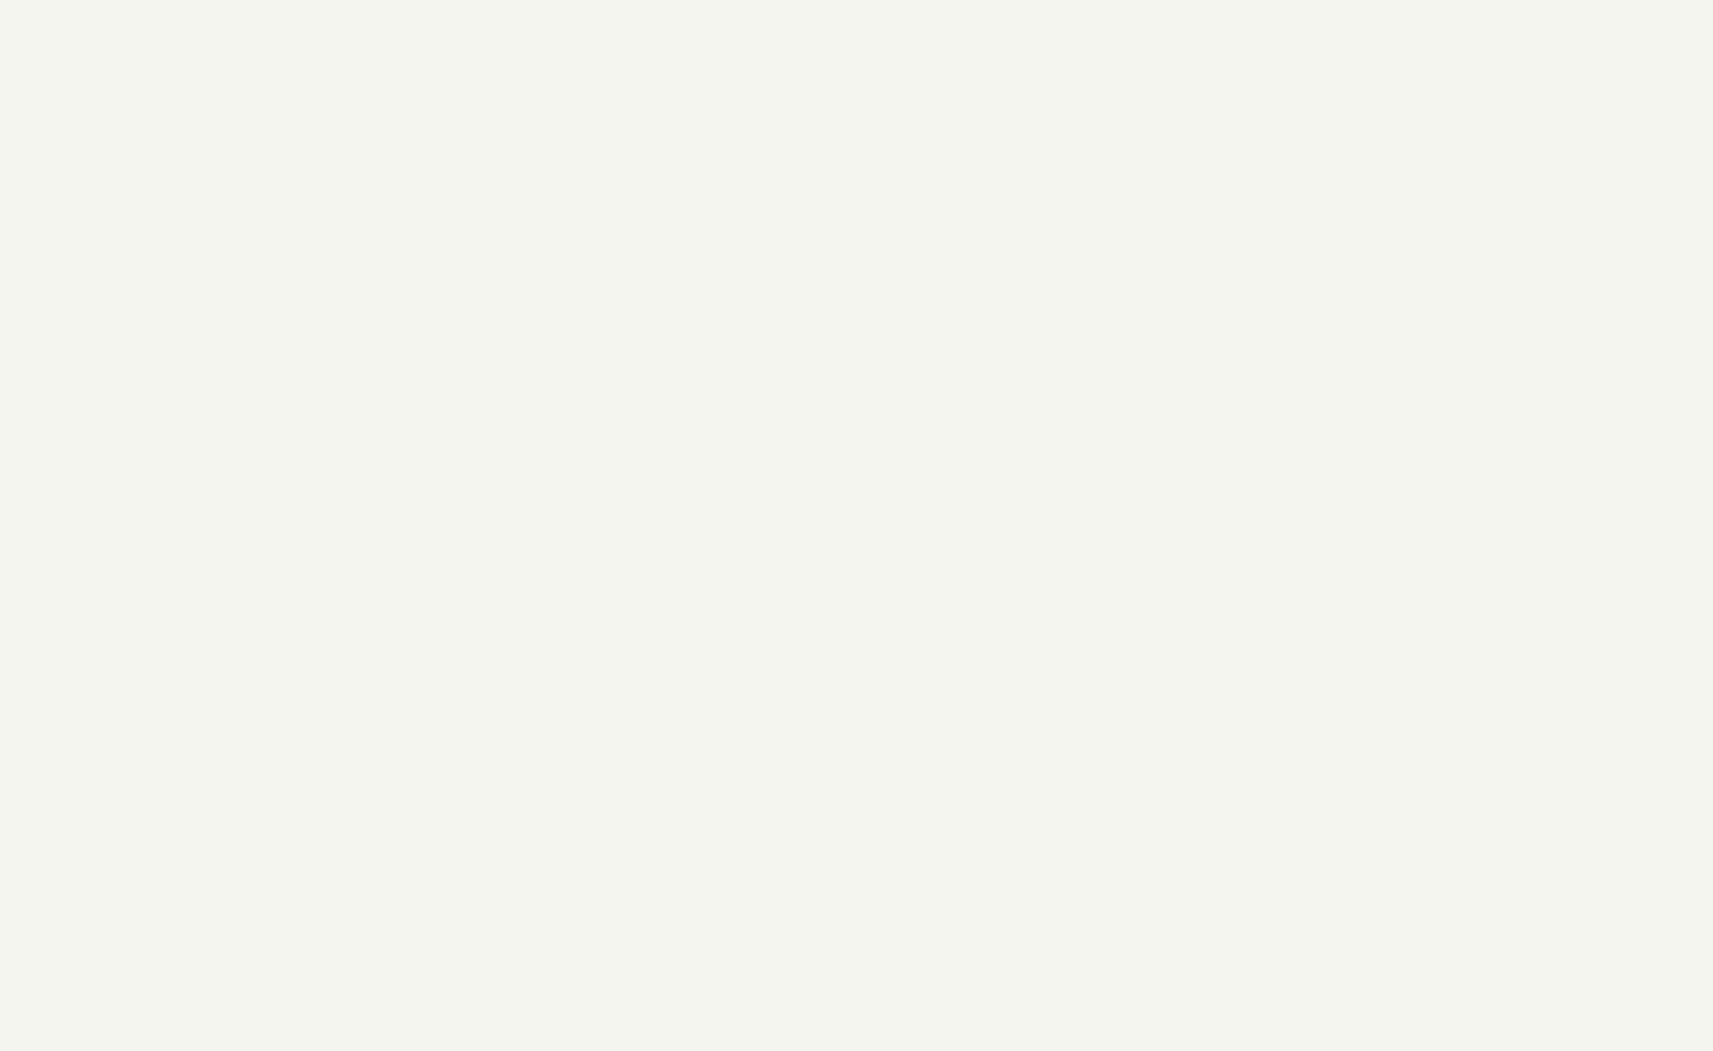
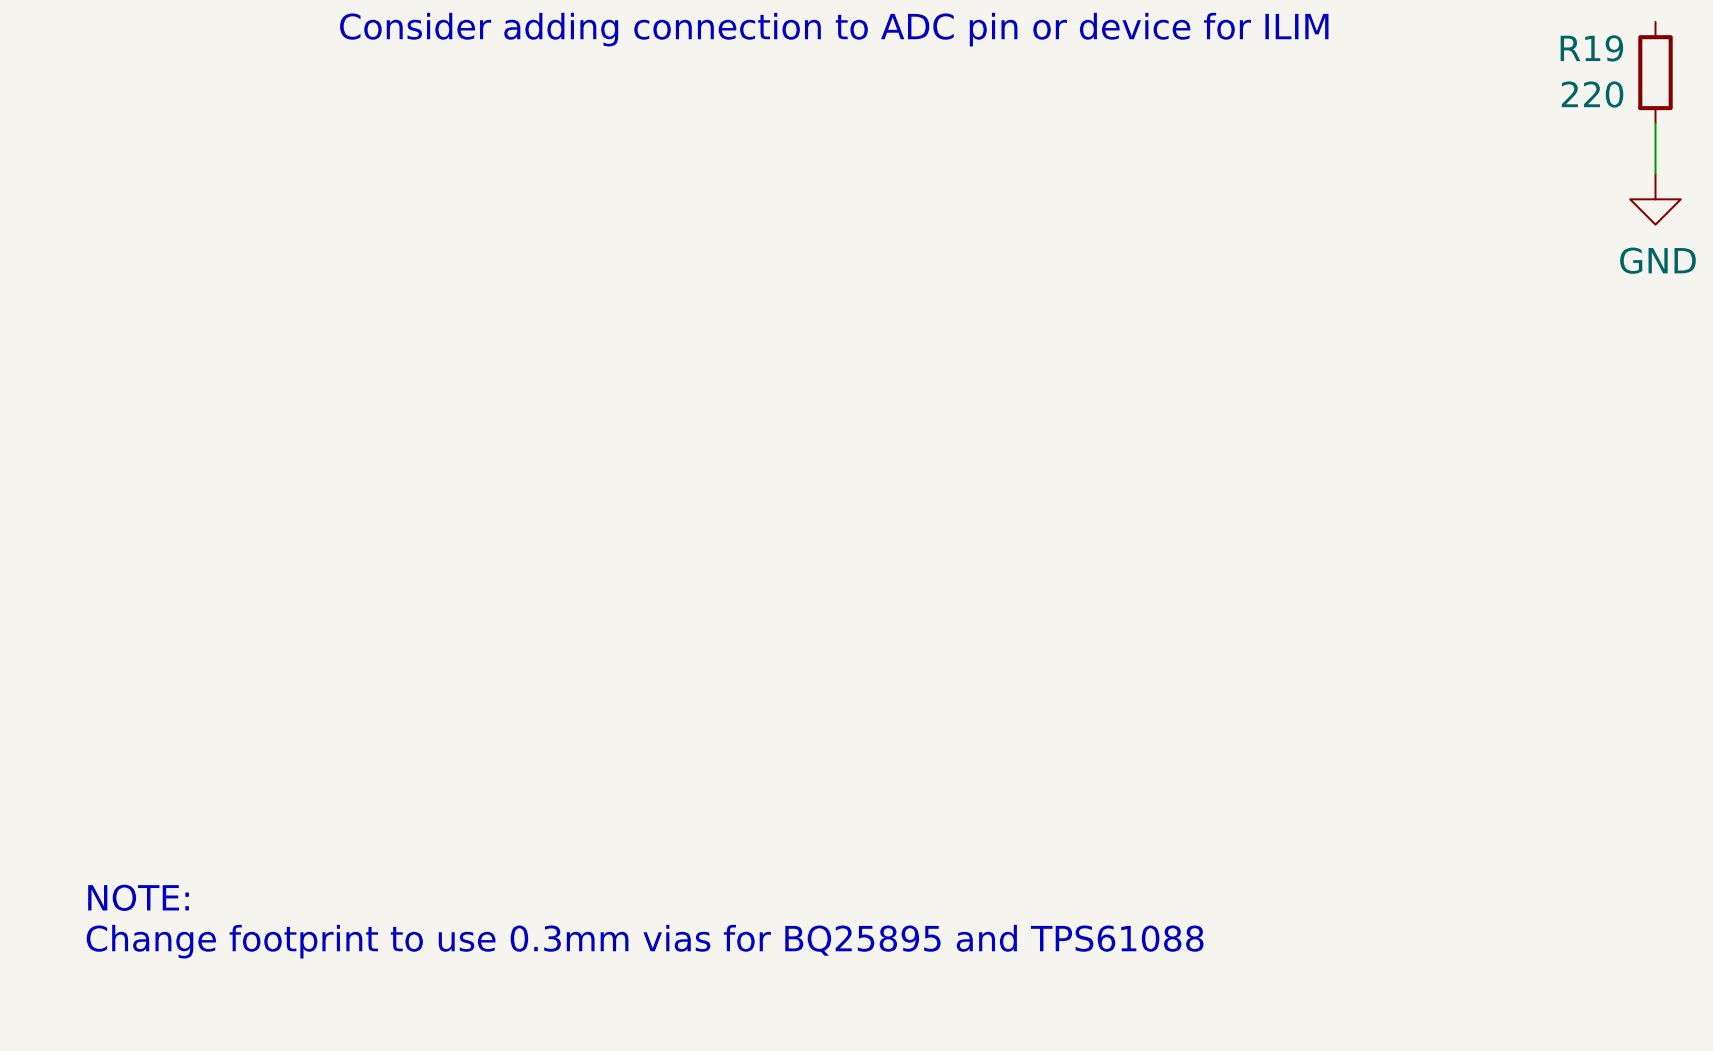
text: none -> Consider adding connection to ADC pin or device for ILIM (834, 29)
R19: none -> 220 (1655, 72)
wire: none -> (1655, 123) (1655, 173)
power symbol: none -> GND (1655, 199)
text: none -> NOTE: (138, 897)
text: none -> Change footprint to use 0.3mm vias for BQ25895 and TPS61088 (645, 941)

